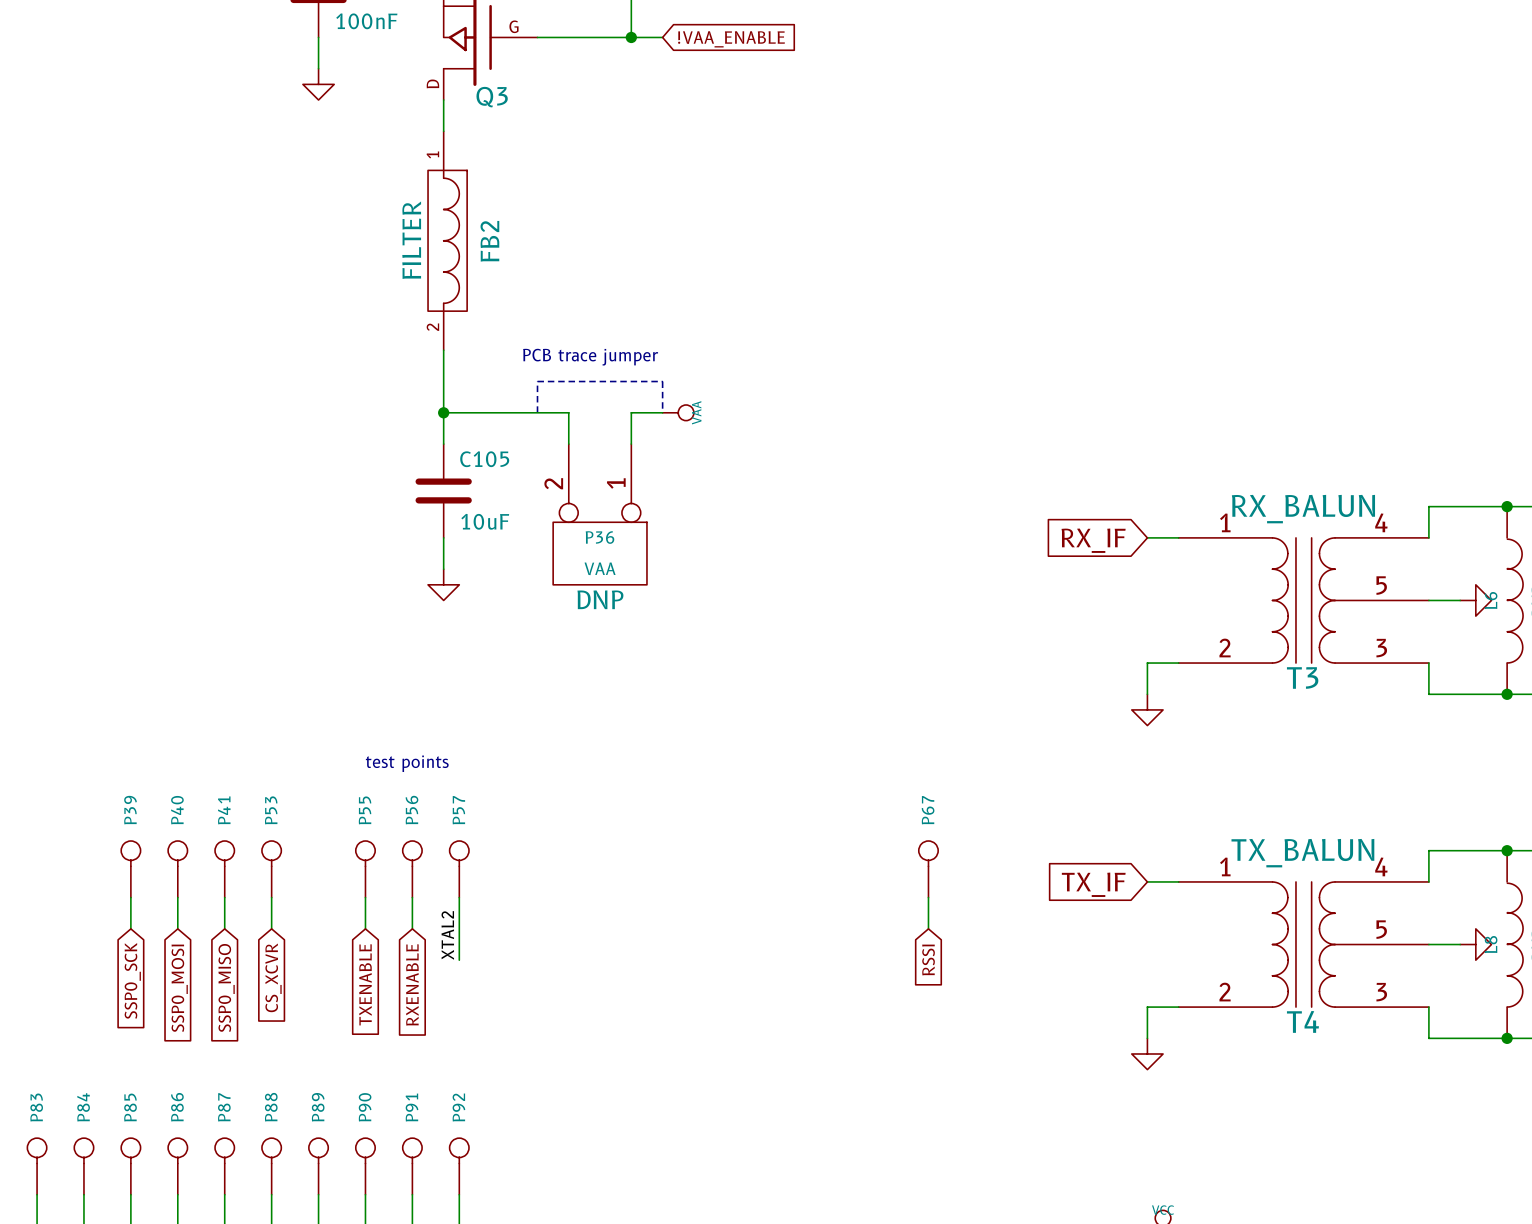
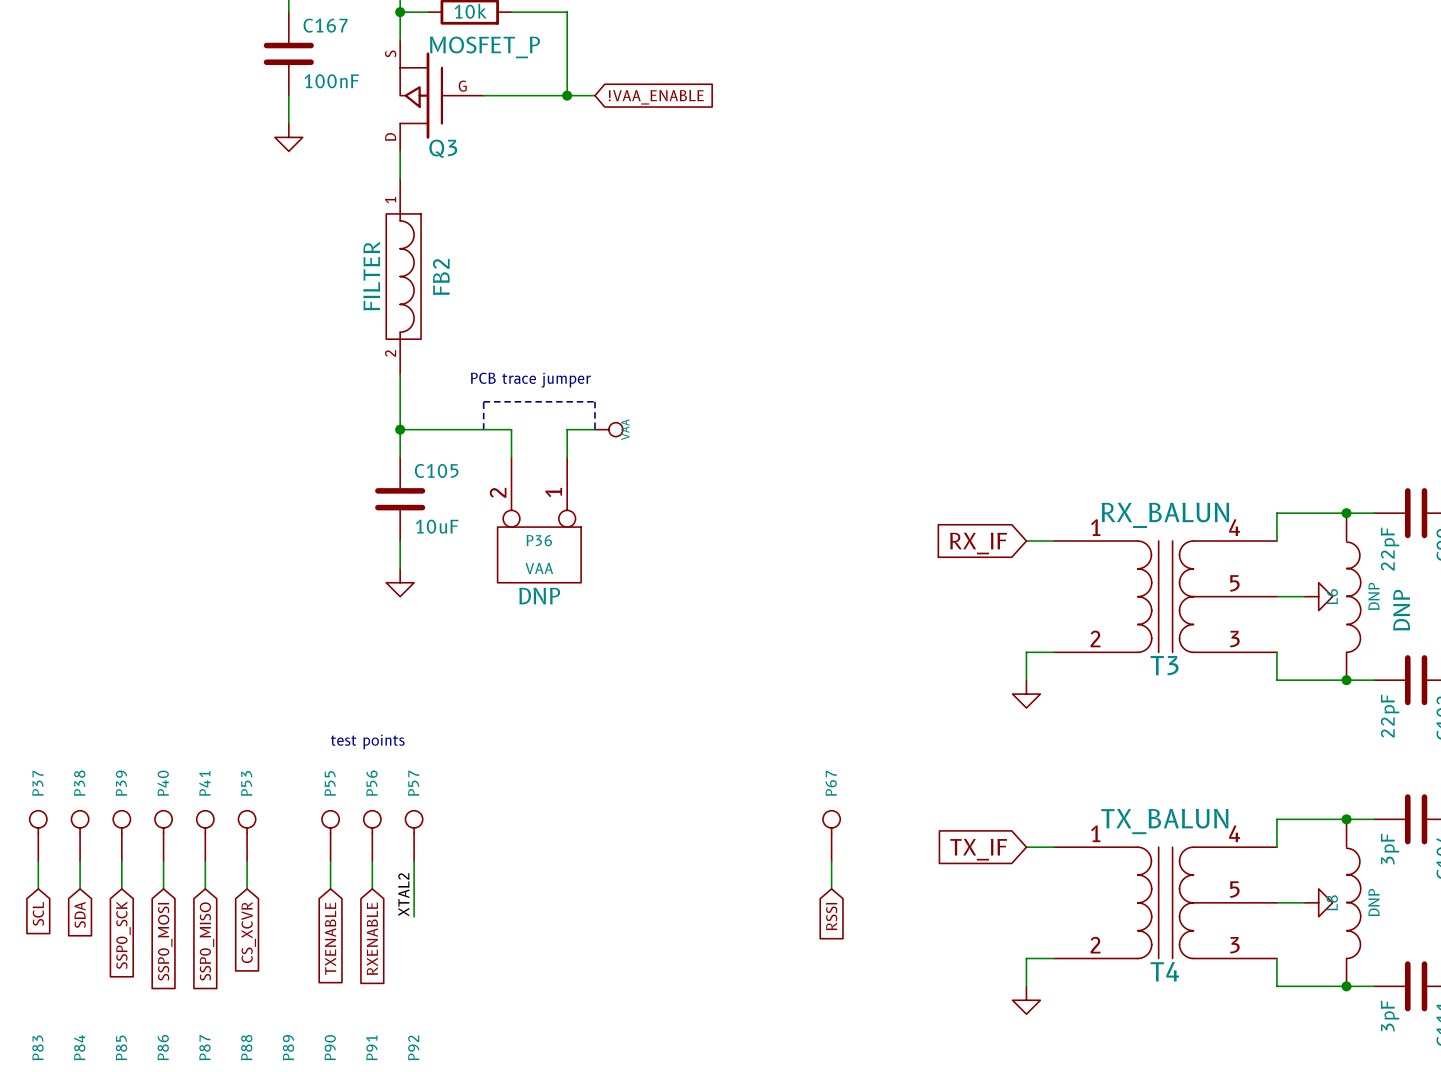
P37: none -> (38, 835)
P38: none -> (80, 835)
wire: none -> (38, 861) (38, 888)
wire: none -> (80, 861) (80, 888)
global label: none -> SCL (38, 913)
global label: none -> SDA (80, 914)

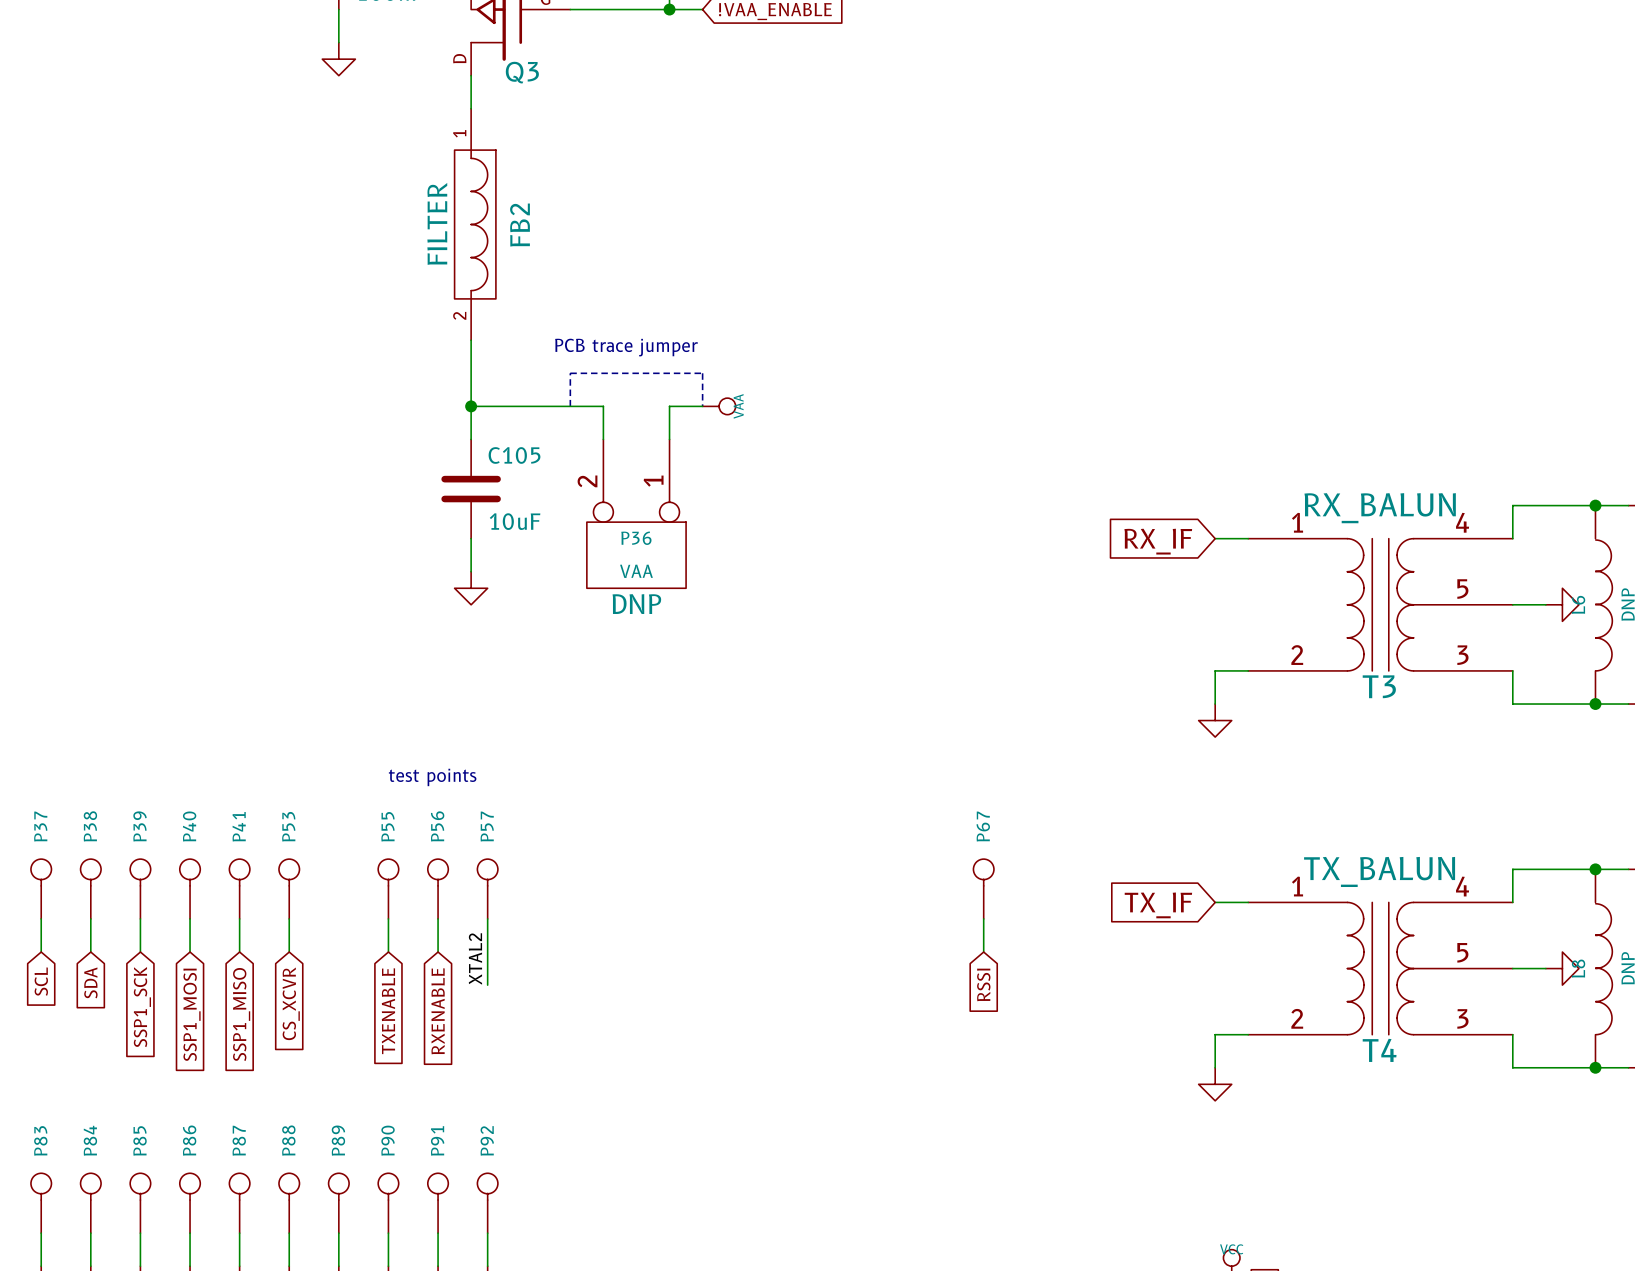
global label: SSP0_SCK (123, 935) -> SSP1_SCK (142, 1007)
global label: SSP0_MOSI (165, 941) -> SSP1_MOSI (192, 1014)
global label: SSP0_MISO (206, 941) -> SSP1_MISO (241, 1014)

